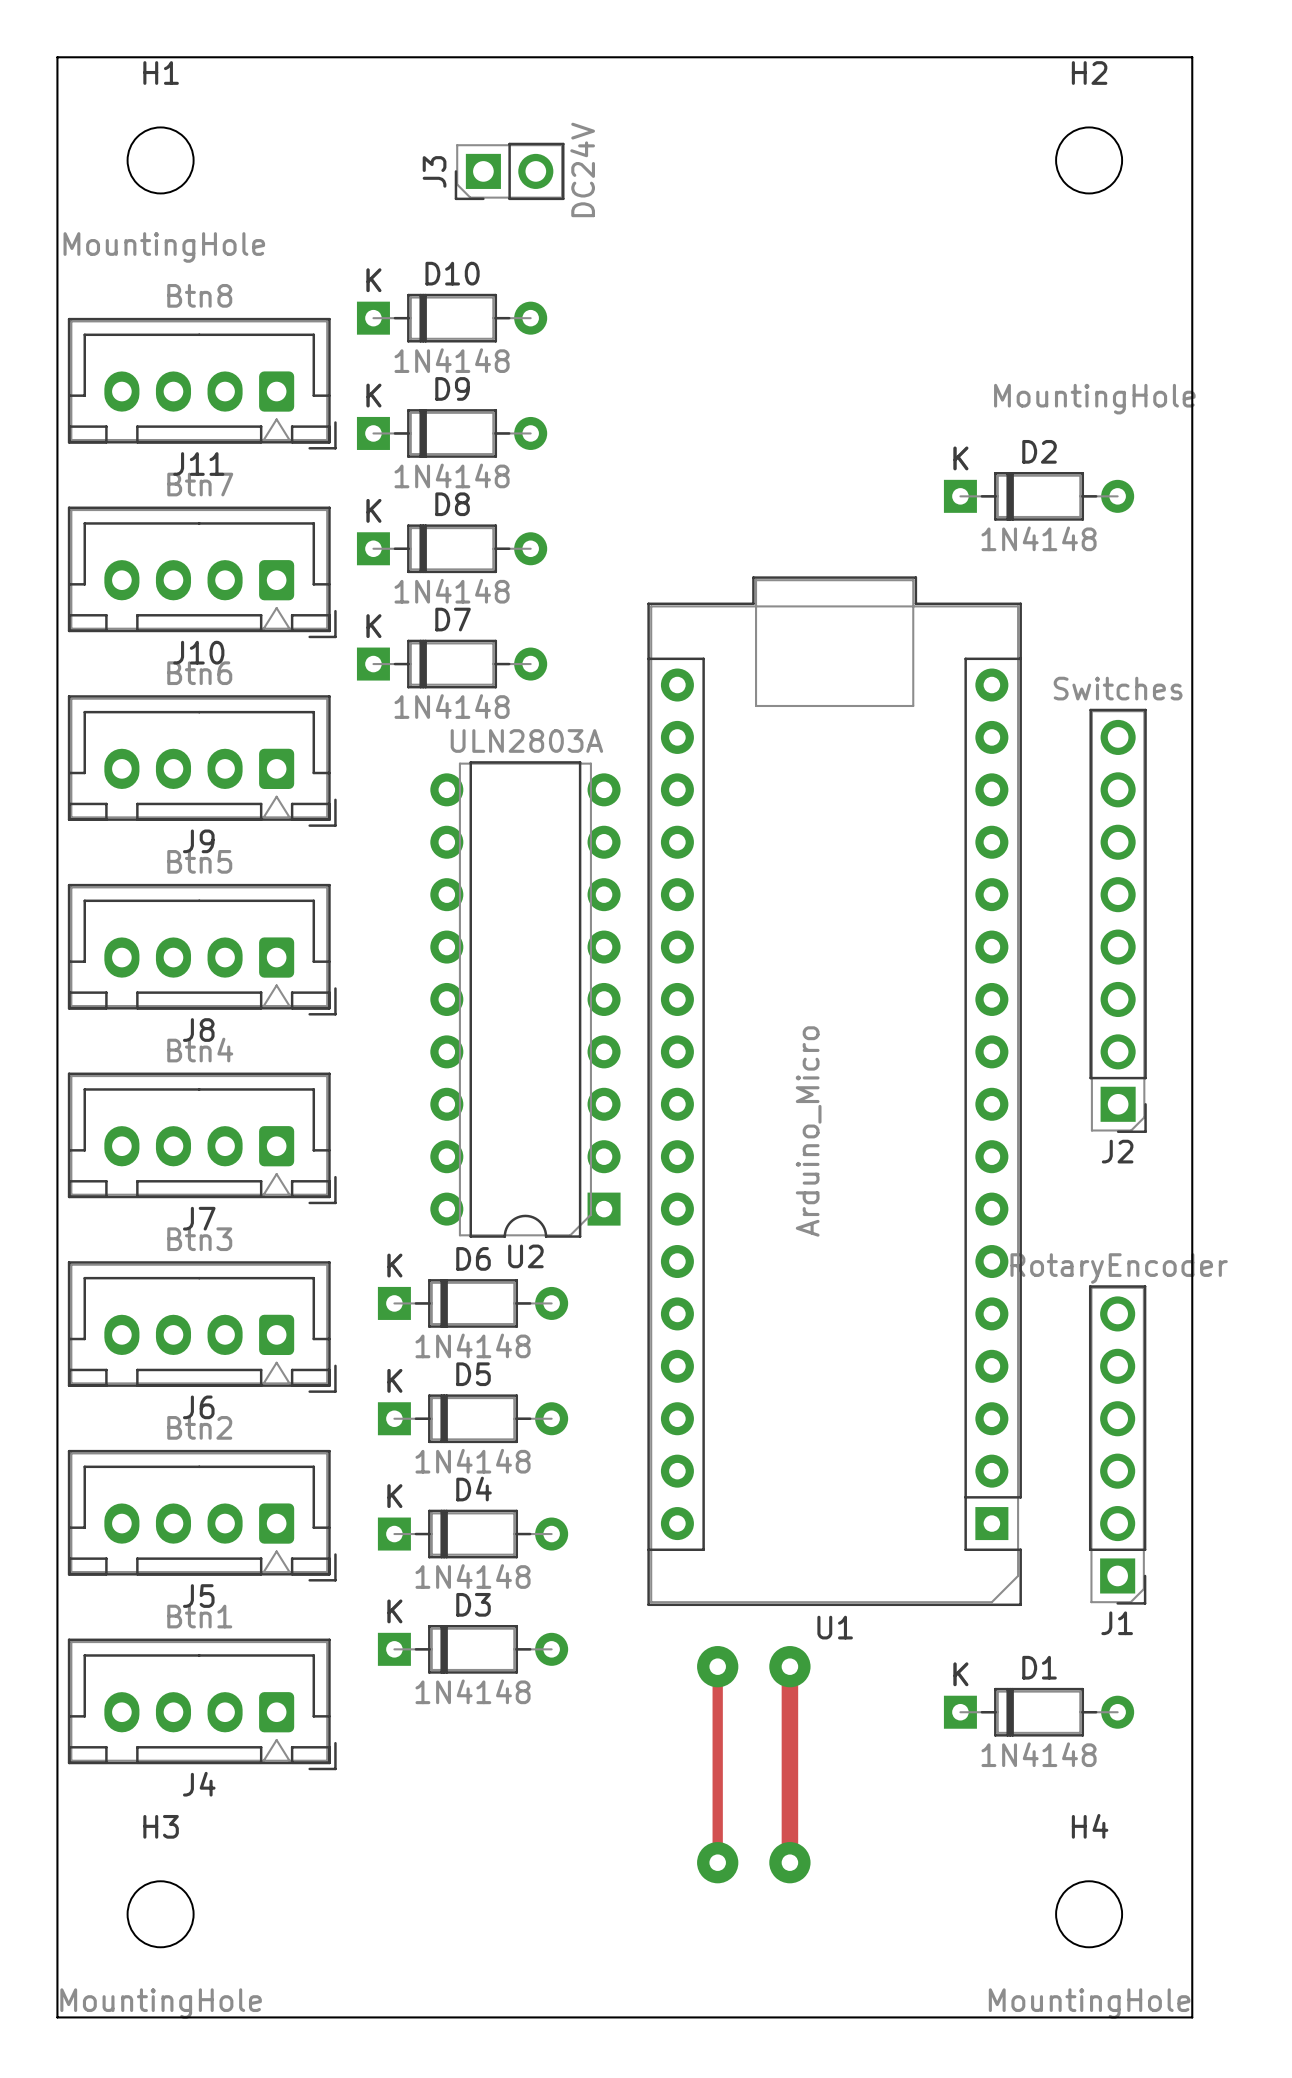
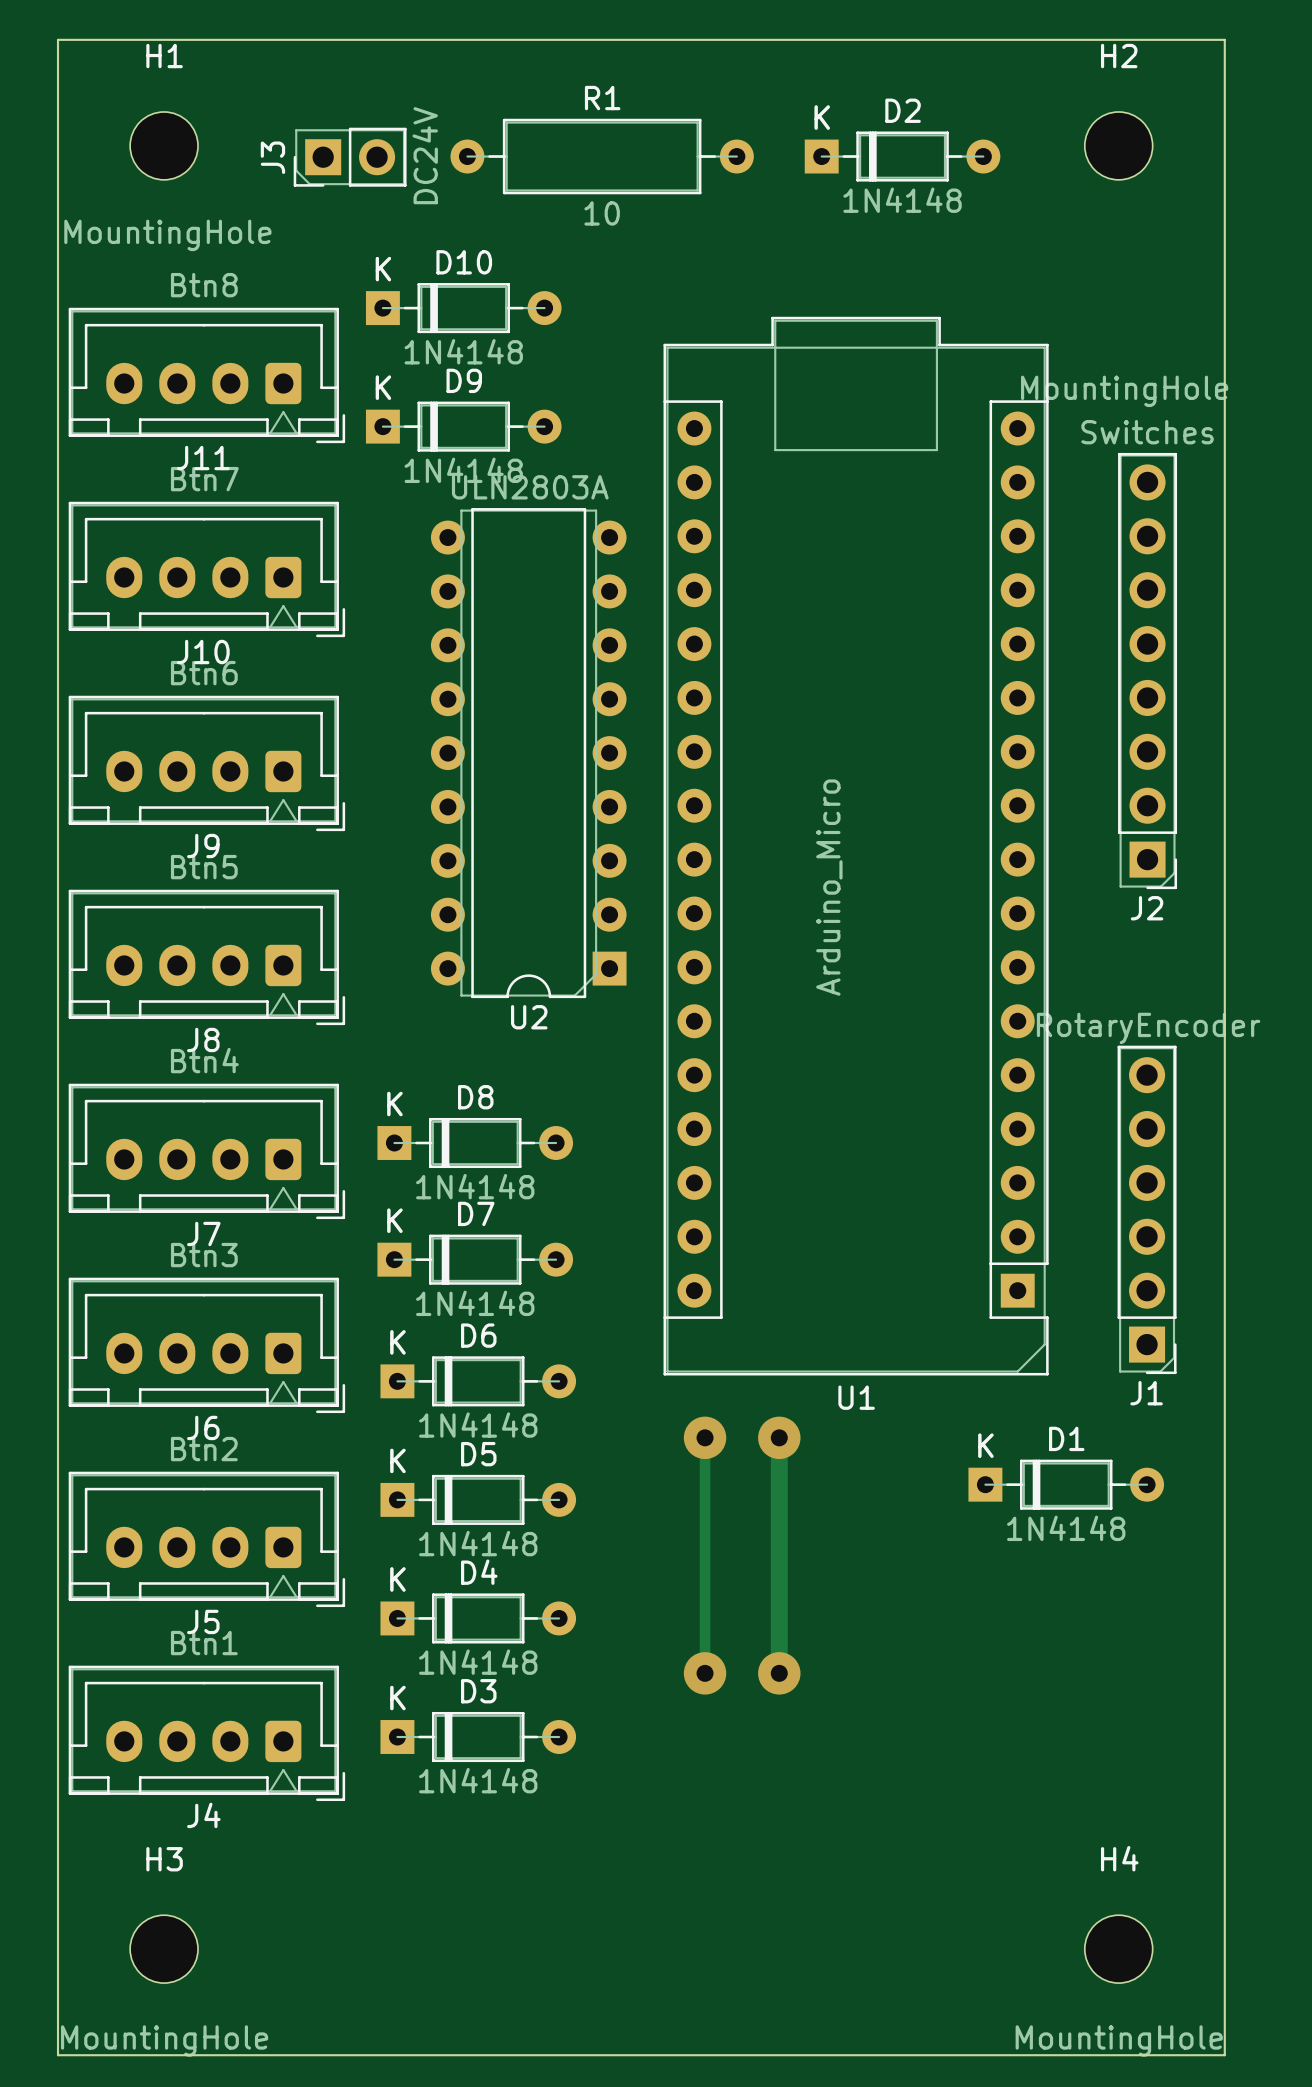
R1: none -> 10 (602, 156)
J3 position: (509, 171) -> (350, 157)
D2 position: (1039, 496) -> (902, 156)
D8 position: (452, 548) -> (475, 1143)
D7 position: (452, 664) -> (475, 1259)
J2 position: (1118, 920) -> (1147, 671)
U2 position: (525, 999) -> (528, 753)
U1 position: (834, 1091) -> (856, 846)
D6 position: (473, 1303) -> (478, 1381)
track: none -> (705, 1437) (705, 1673)
via: none -> (705, 1437)
track: none -> (779, 1437) (779, 1673)
via: none -> (779, 1437)
D5 position: (473, 1418) -> (478, 1499)
J1 position: (1117, 1444) -> (1147, 1209)
D4 position: (473, 1534) -> (478, 1618)
via: none -> (705, 1673)
via: none -> (779, 1673)
D3 position: (473, 1649) -> (478, 1737)
track: (717, 1666) (717, 1862) -> none
via: (717, 1666) -> none
track: (789, 1666) (789, 1862) -> none
via: (789, 1666) -> none
D1 position: (1039, 1712) -> (1066, 1484)
via: (717, 1862) -> none
via: (789, 1862) -> none

